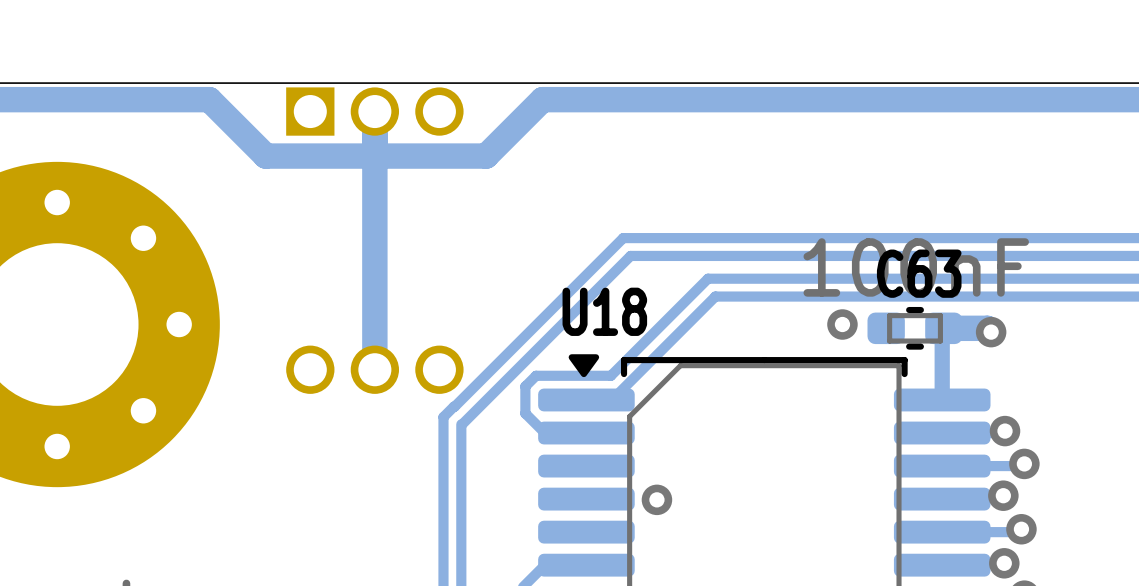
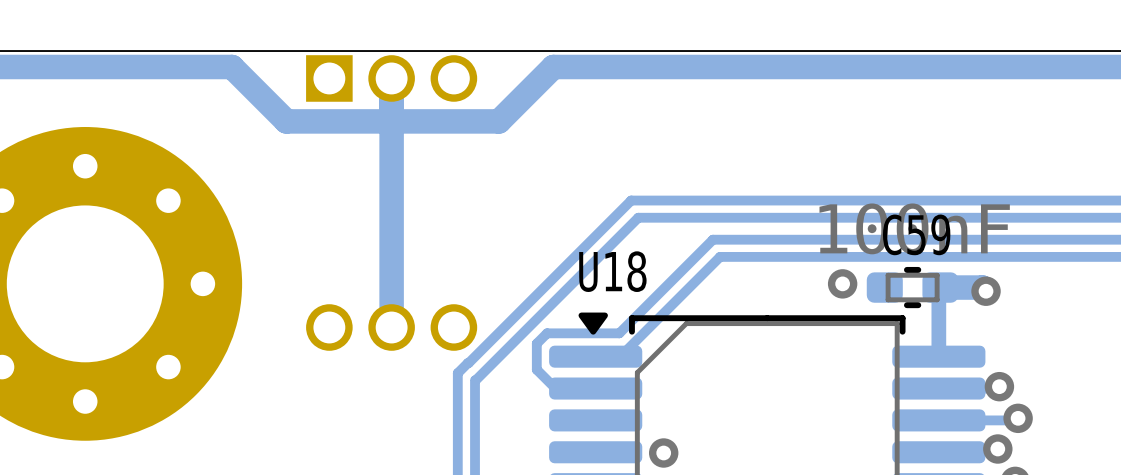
C63 name: C63 (919, 273) -> C59 (916, 234)

